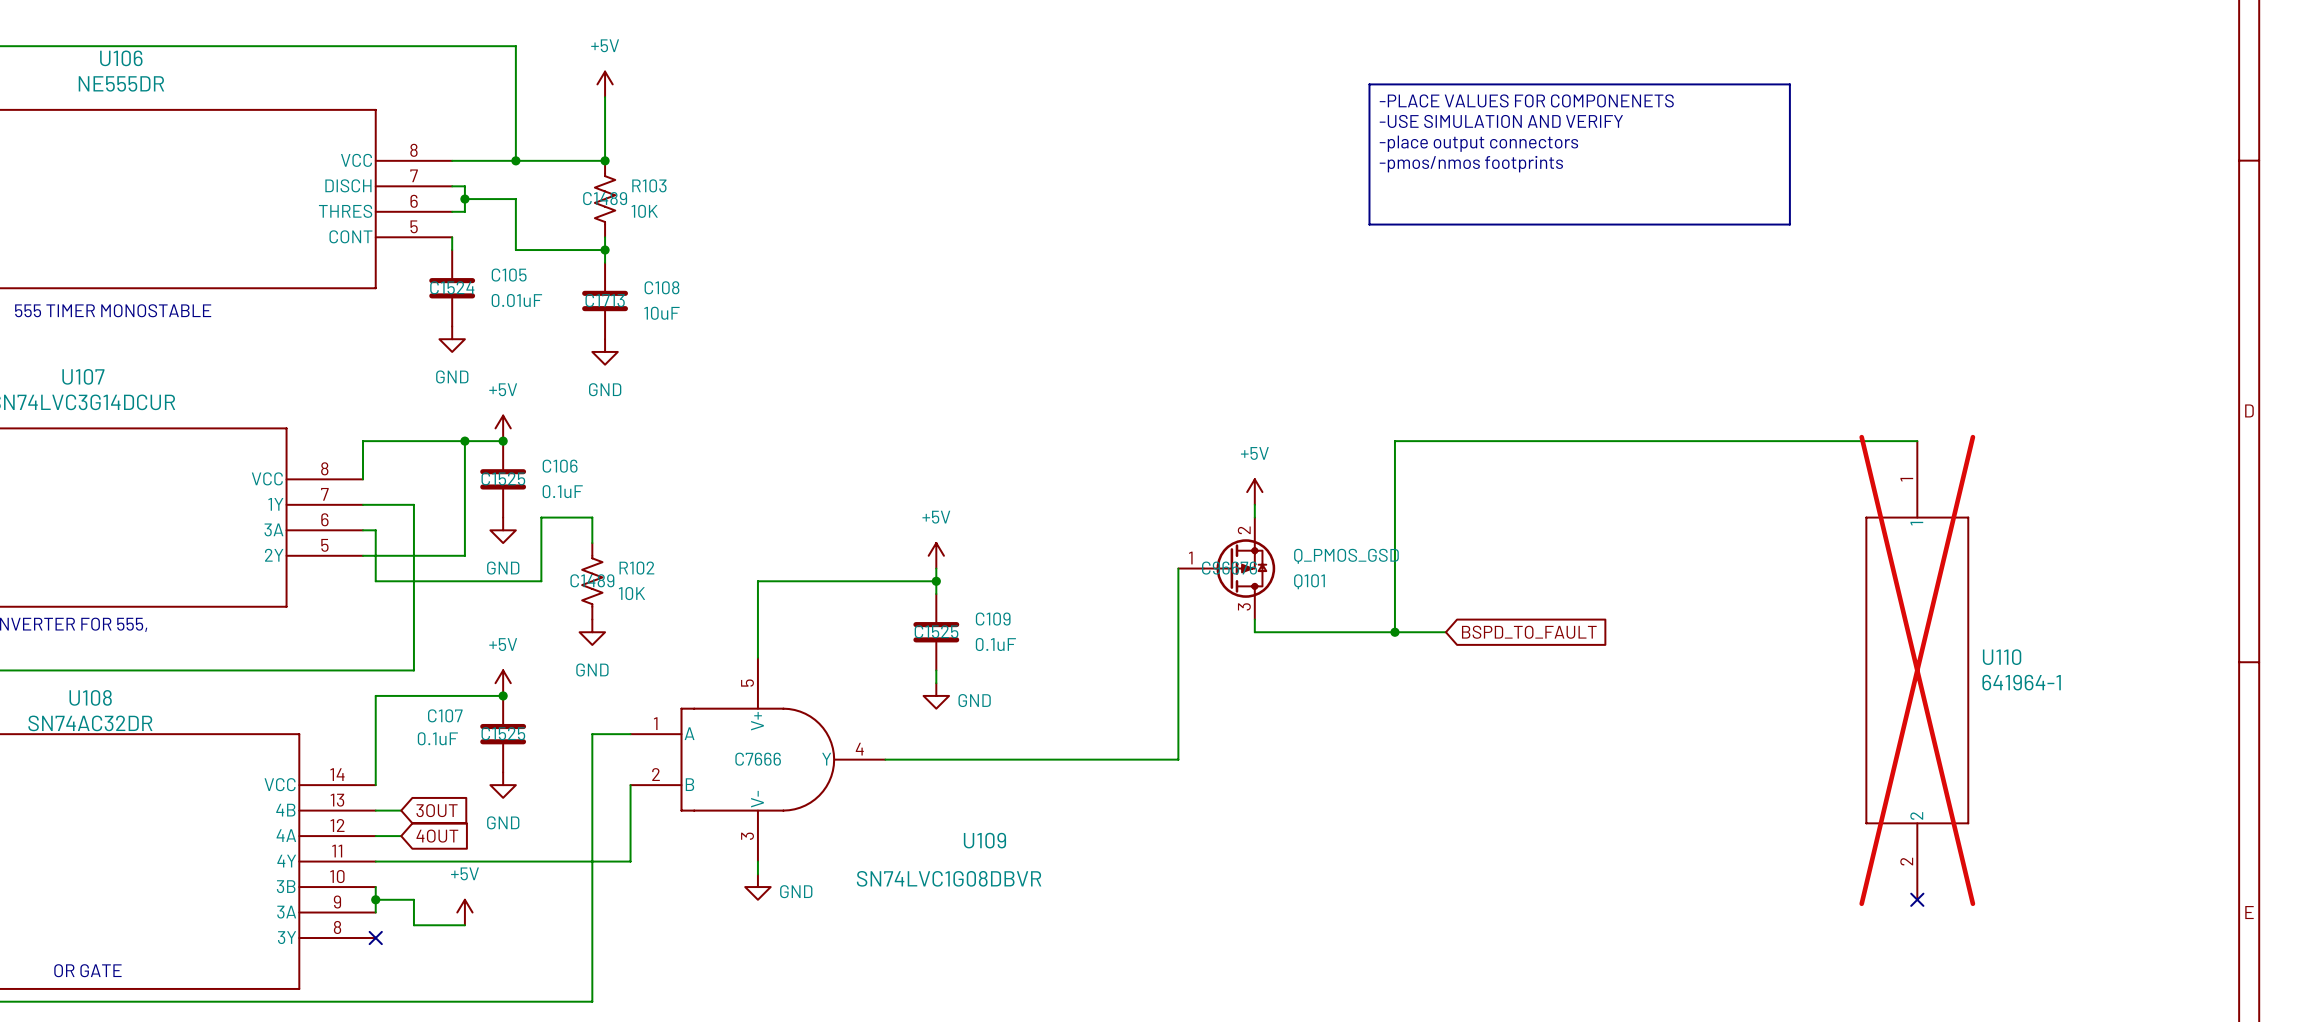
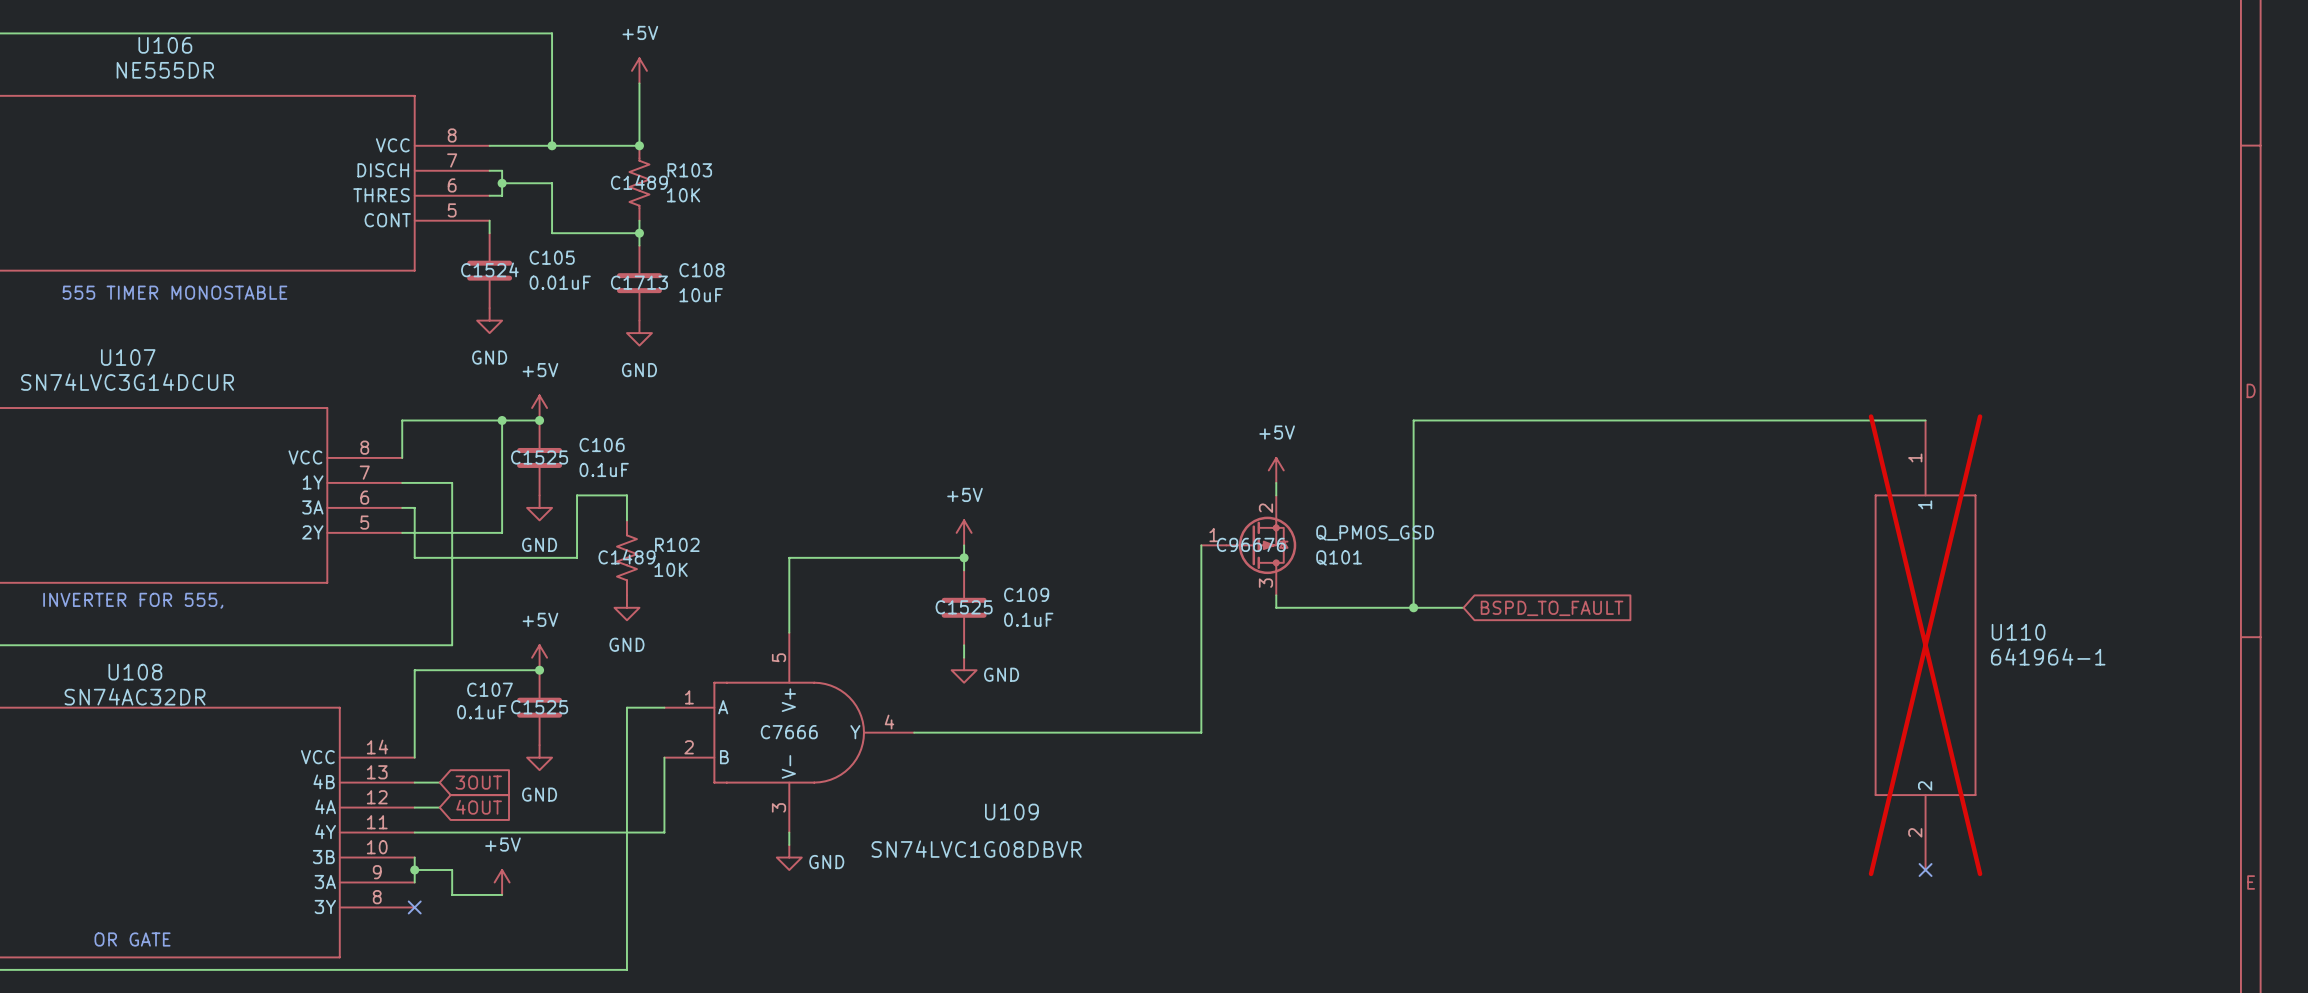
line: (1369, 84) (1789, 84) (1789, 224) (1369, 224) (1369, 84) -> none
text: -PLACE VALUES FOR COMPONENETS (1526, 100) -> none
text: -USE SIMULATION AND VERIFY (1501, 121) -> none
text: -place output connectors (1478, 143) -> none
text: -pmos/nmos footprints (1471, 164) -> none

